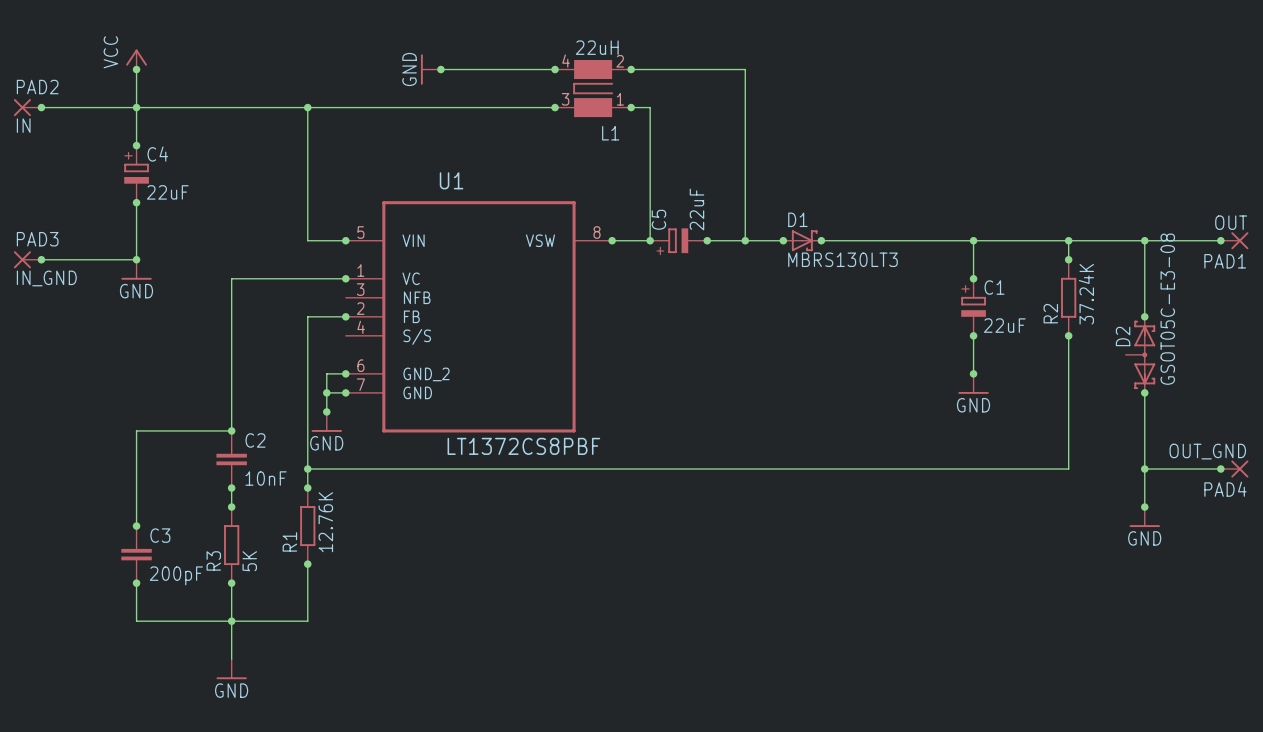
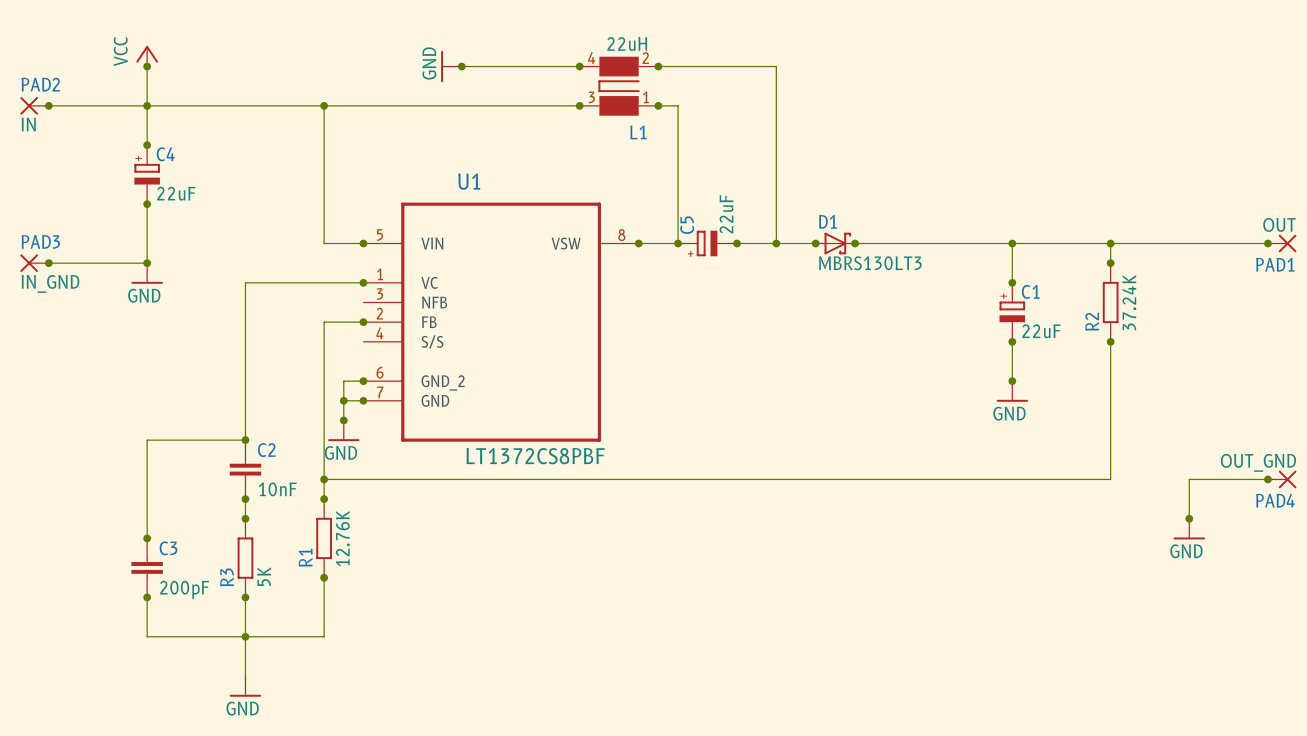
wire: (1144, 240) (1144, 316) -> none
junction: (1144, 240) -> none
junction: (1144, 316) -> none
D2: GSOT05C-E3-08 (1140, 354) -> none
wire: (1144, 392) (1144, 469) -> none
junction: (1144, 392) -> none
junction: (1144, 469) -> none

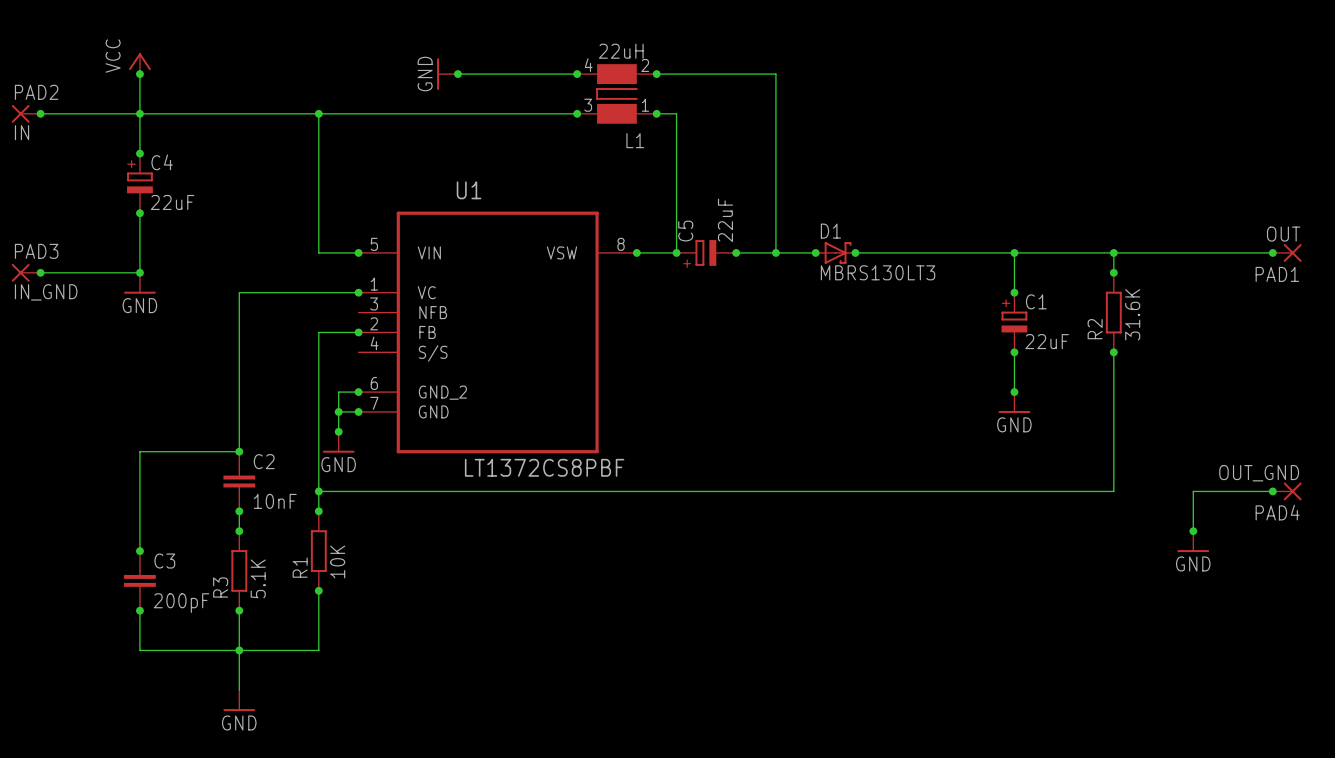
R2 value: 37.24K (1129, 302) -> 31.6K (1132, 314)
R1 value: 12.76K (342, 538) -> 10K (337, 561)
R3 value: 5K (264, 576) -> 5.1K (258, 578)

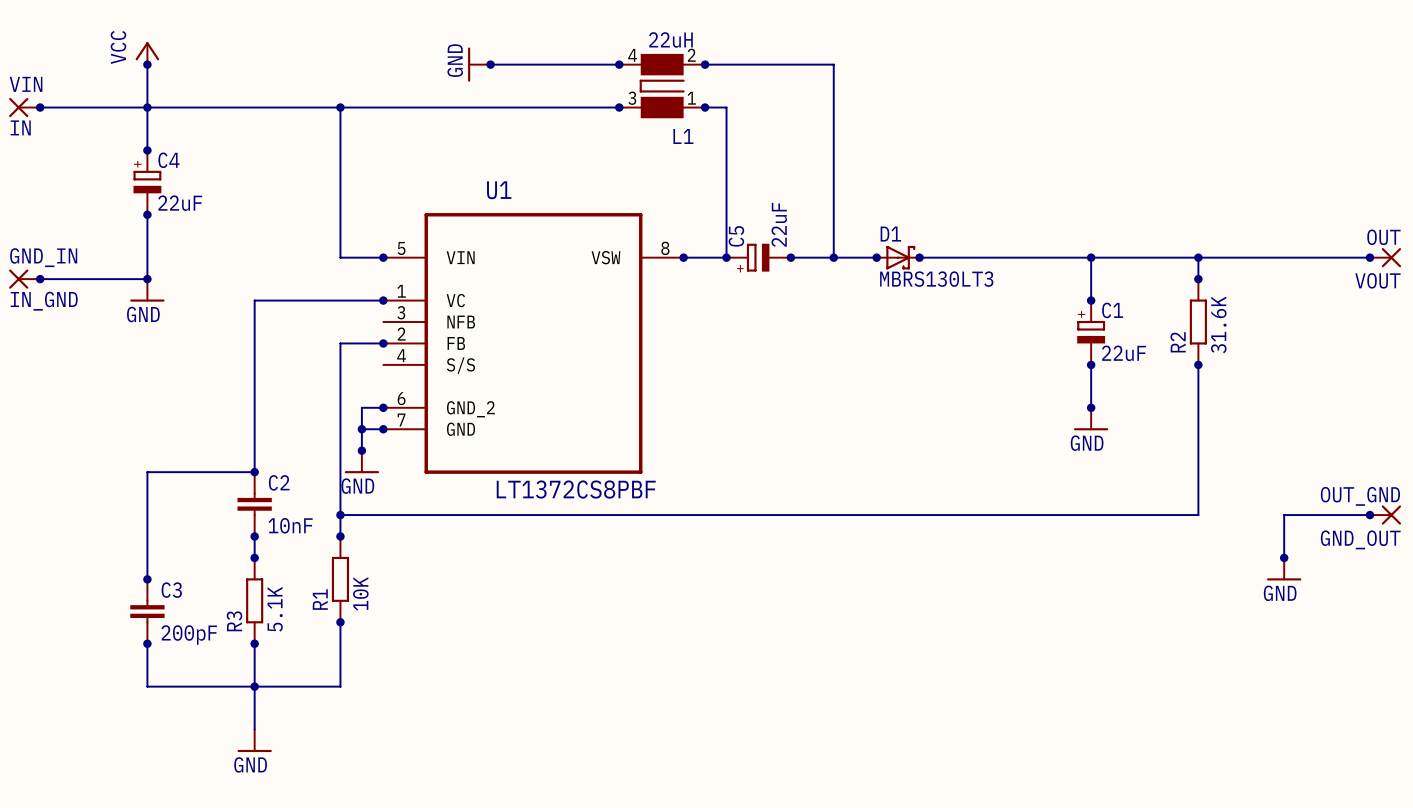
PAD2 name: PAD2 (36, 92) -> VIN (26, 84)
PAD3 name: PAD3 (36, 251) -> GND_IN (43, 257)
PAD1 name: PAD1 (1277, 274) -> VOUT (1377, 280)
PAD4 name: PAD4 (1277, 512) -> GND_OUT (1360, 539)

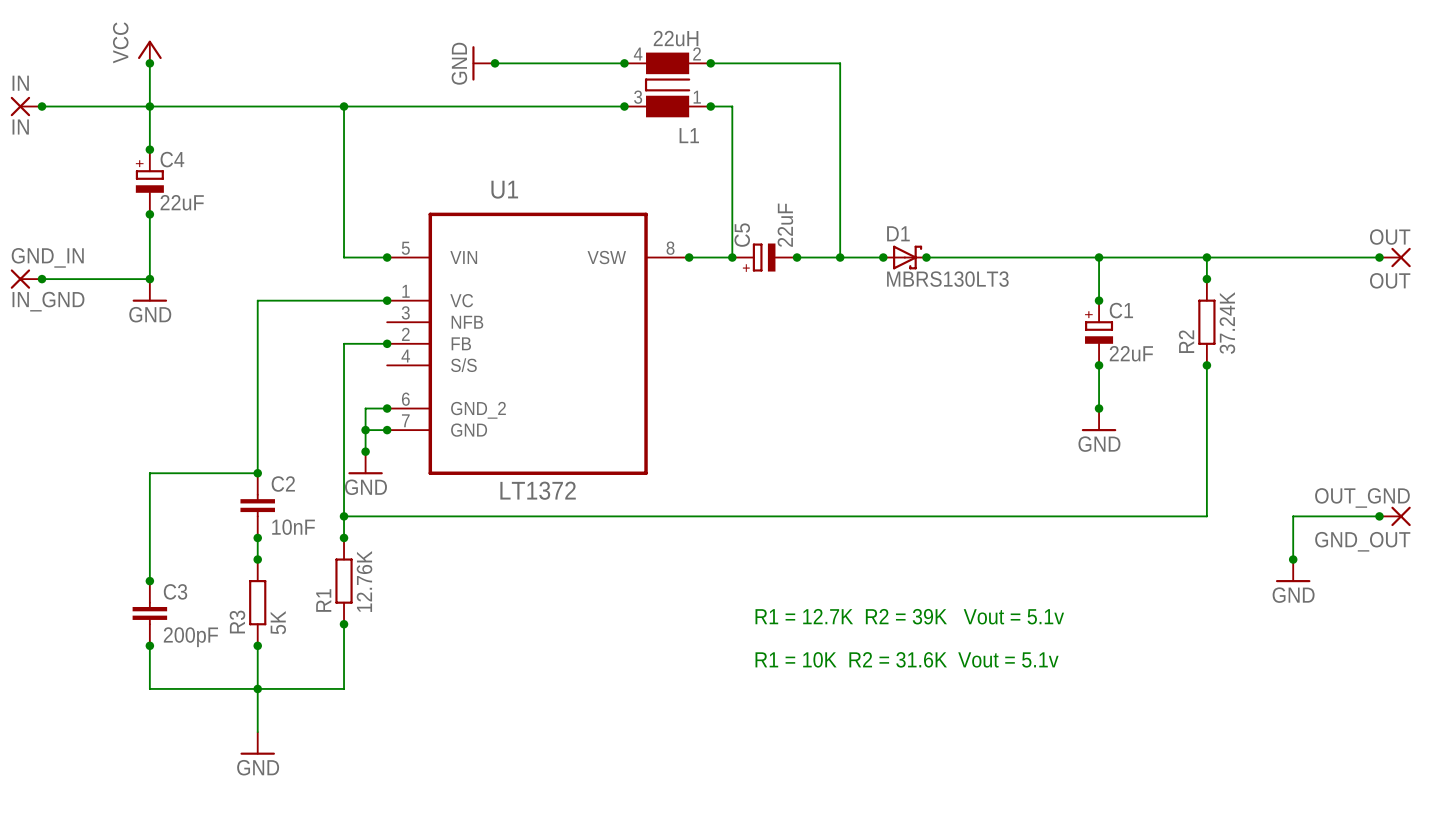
VIN name: VIN (26, 84) -> IN (20, 83)
VOUT name: VOUT (1377, 280) -> OUT (1390, 280)
R2 value: 31.6K (1218, 324) -> 37.24K (1227, 323)
U1 value: LT1372CS8PBF (576, 489) -> LT1372 (538, 490)
R1 value: 10K (360, 593) -> 12.76K (364, 581)
R3 value: 5.1K (275, 609) -> 5K (278, 622)
text: none -> R1 = 12.7K R2 = 39K Vout = 5.1v (909, 616)
text: none -> R1 = 10K R2 = 31.6K Vout = 5.1v (907, 659)

